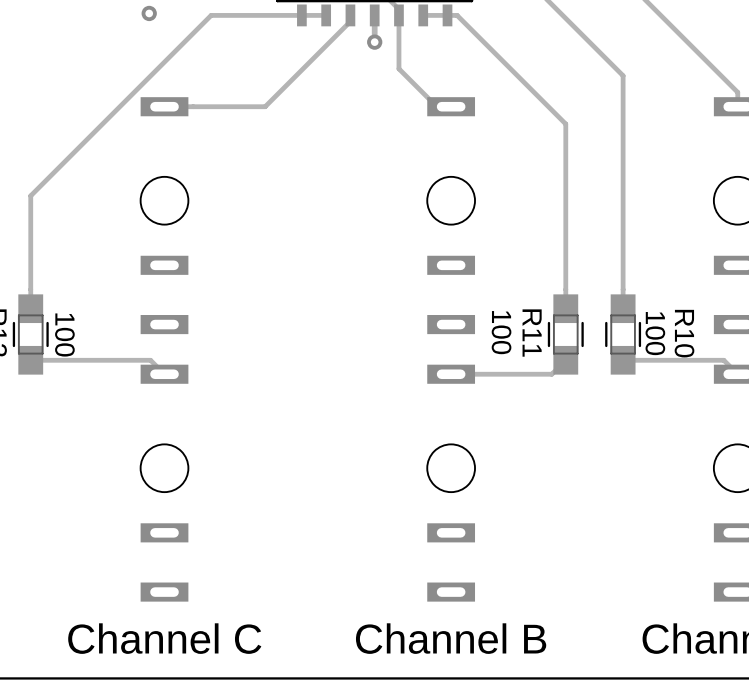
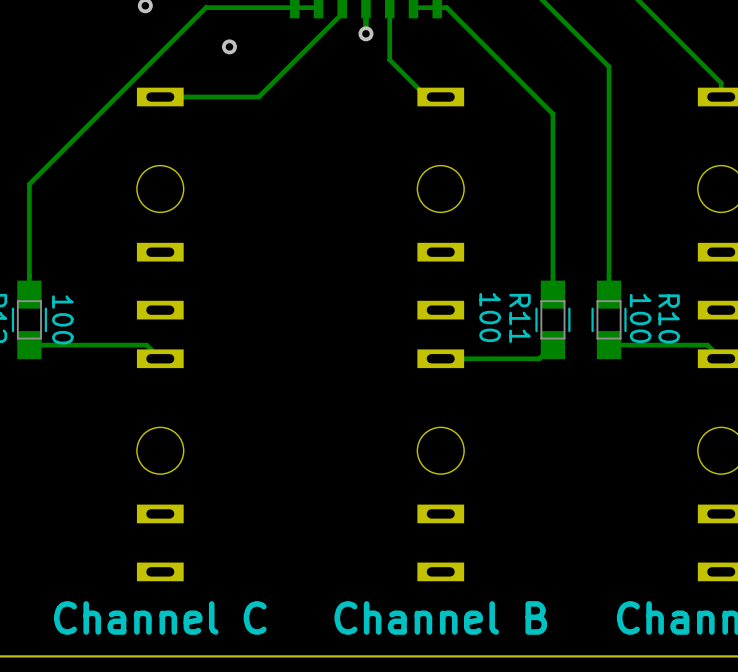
via: none -> (229, 46)

